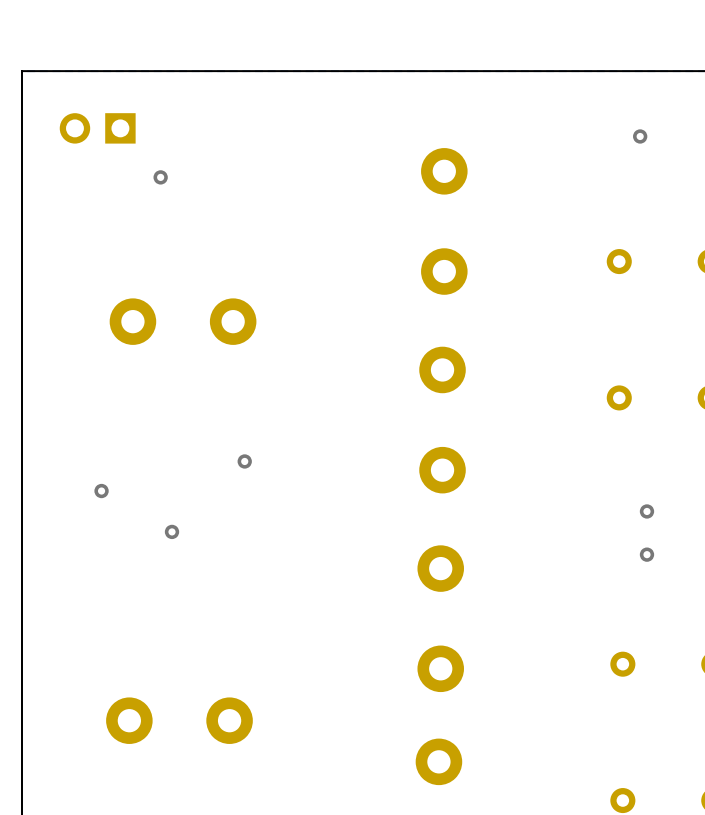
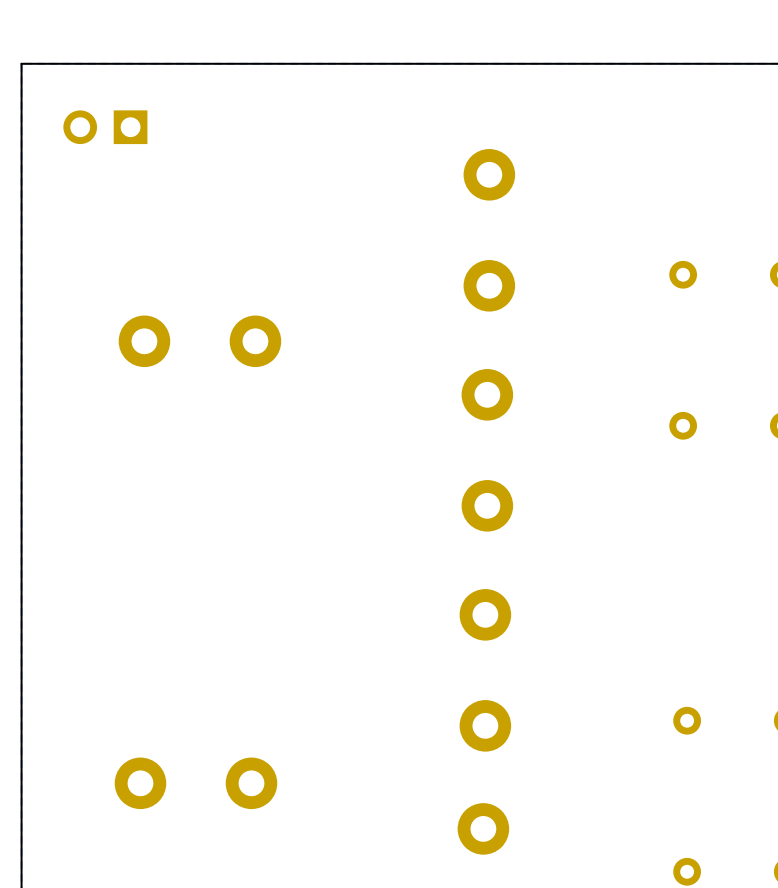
via: (640, 136) -> none
via: (160, 177) -> none
via: (244, 461) -> none
via: (101, 491) -> none
via: (646, 511) -> none
via: (172, 531) -> none
via: (646, 554) -> none

